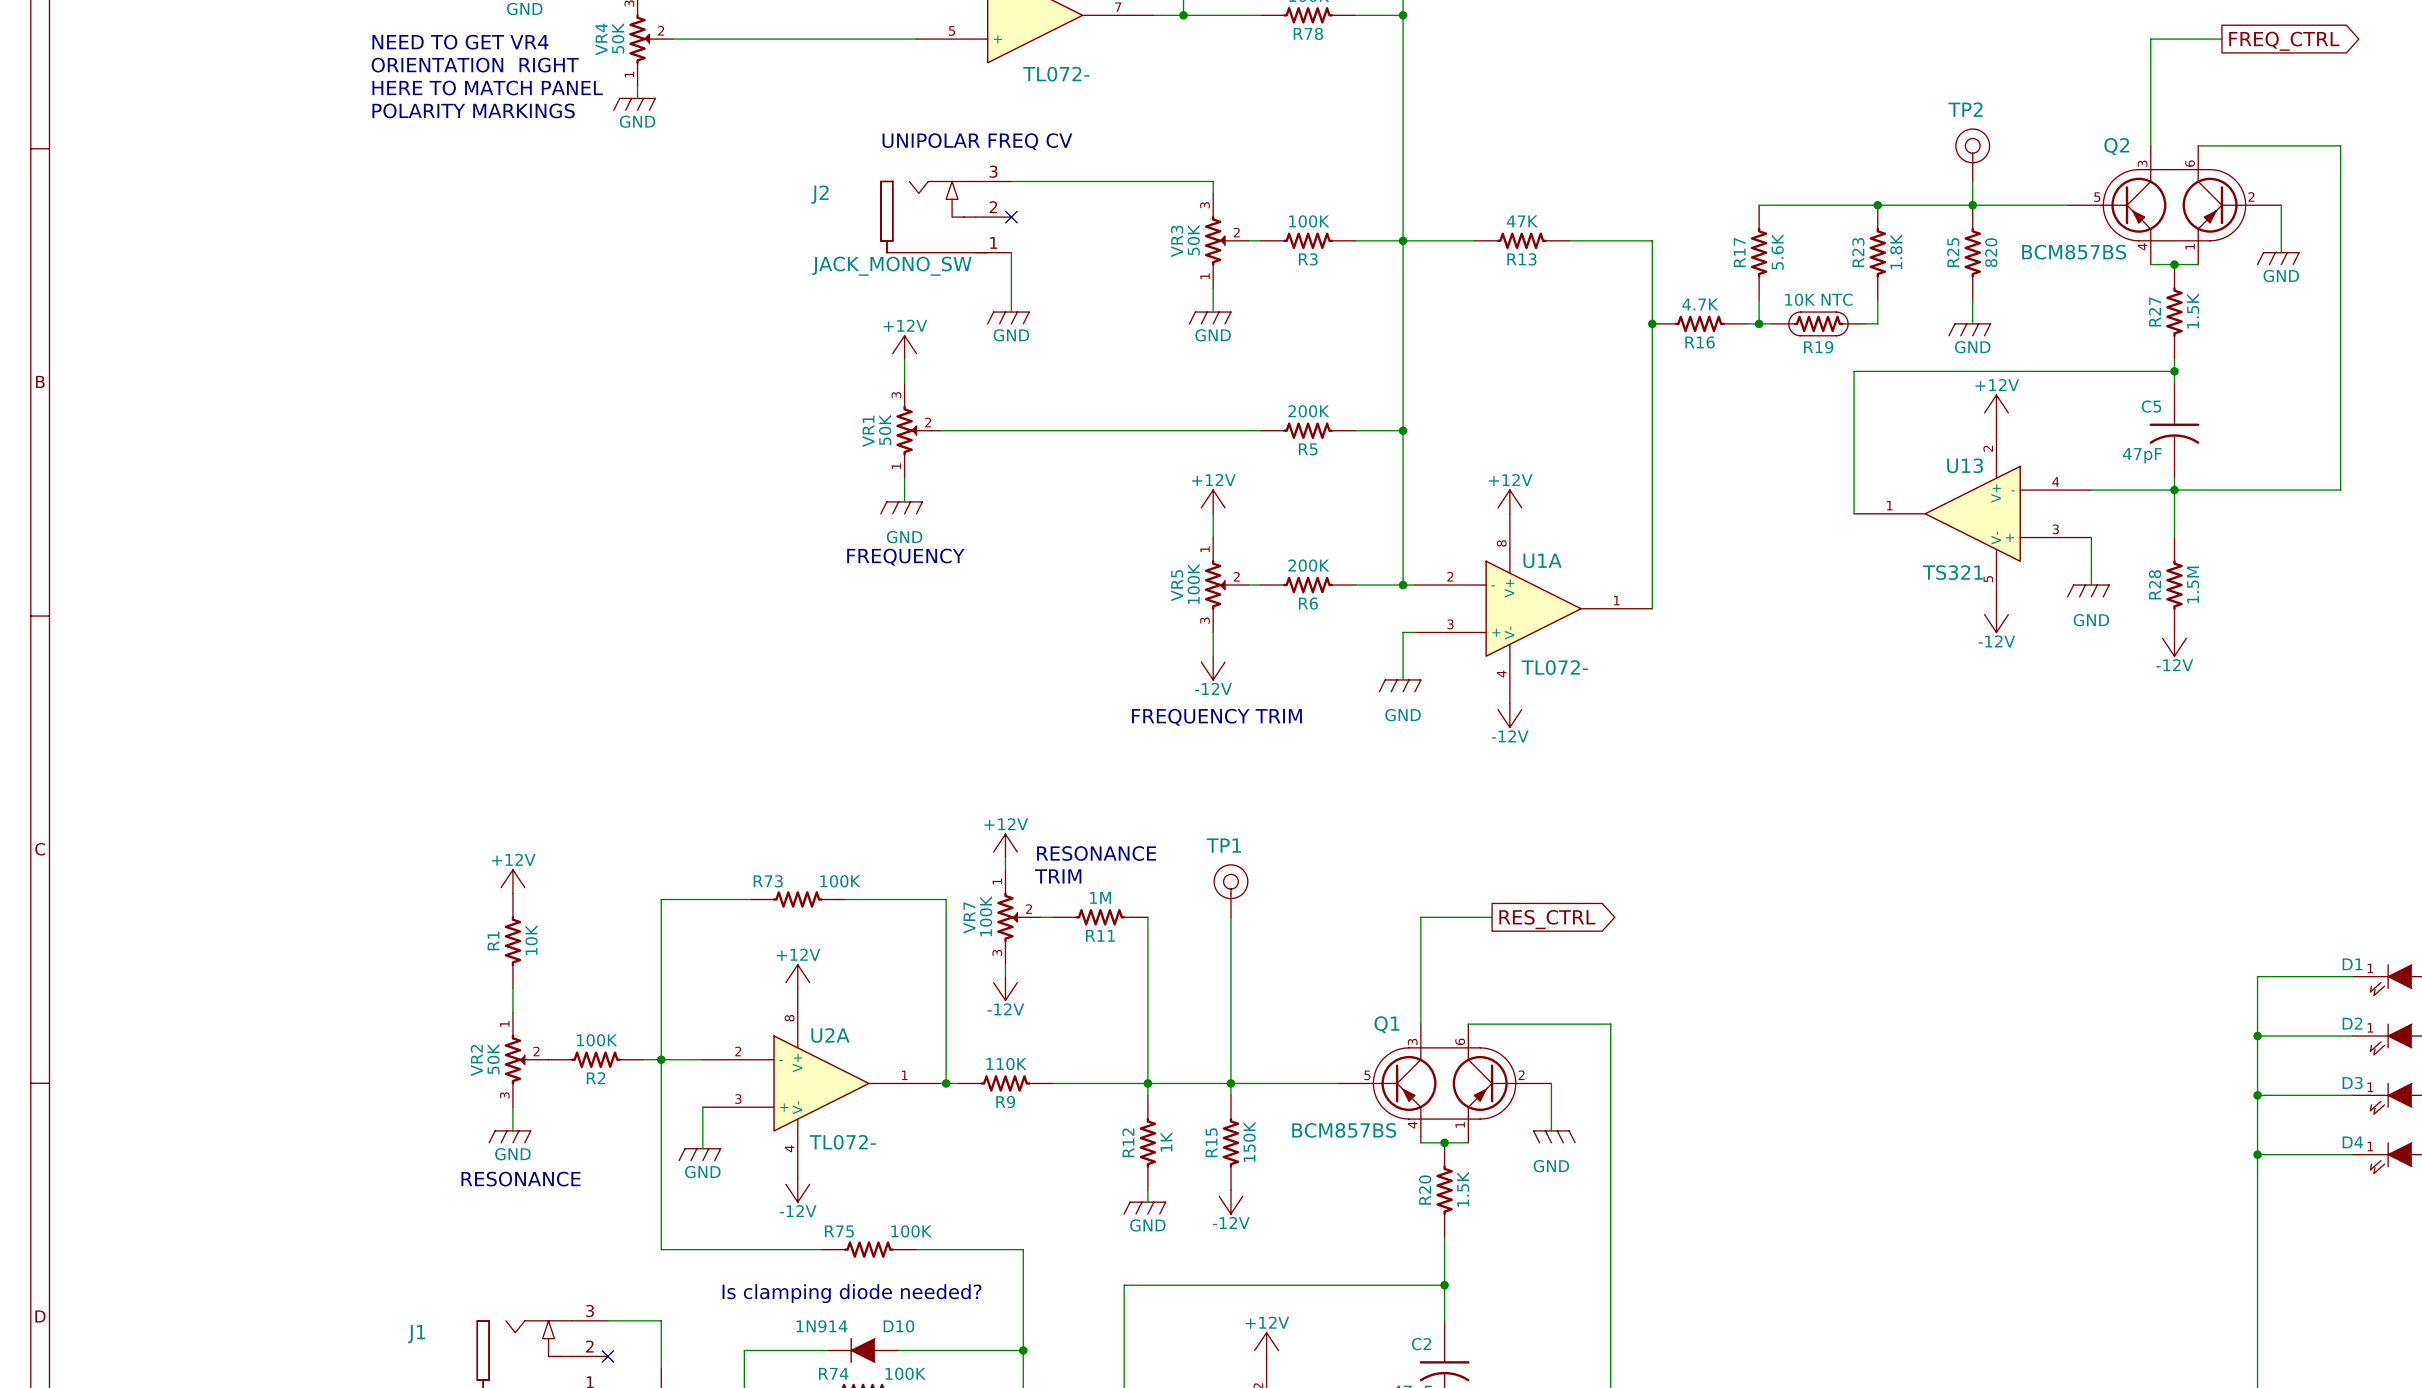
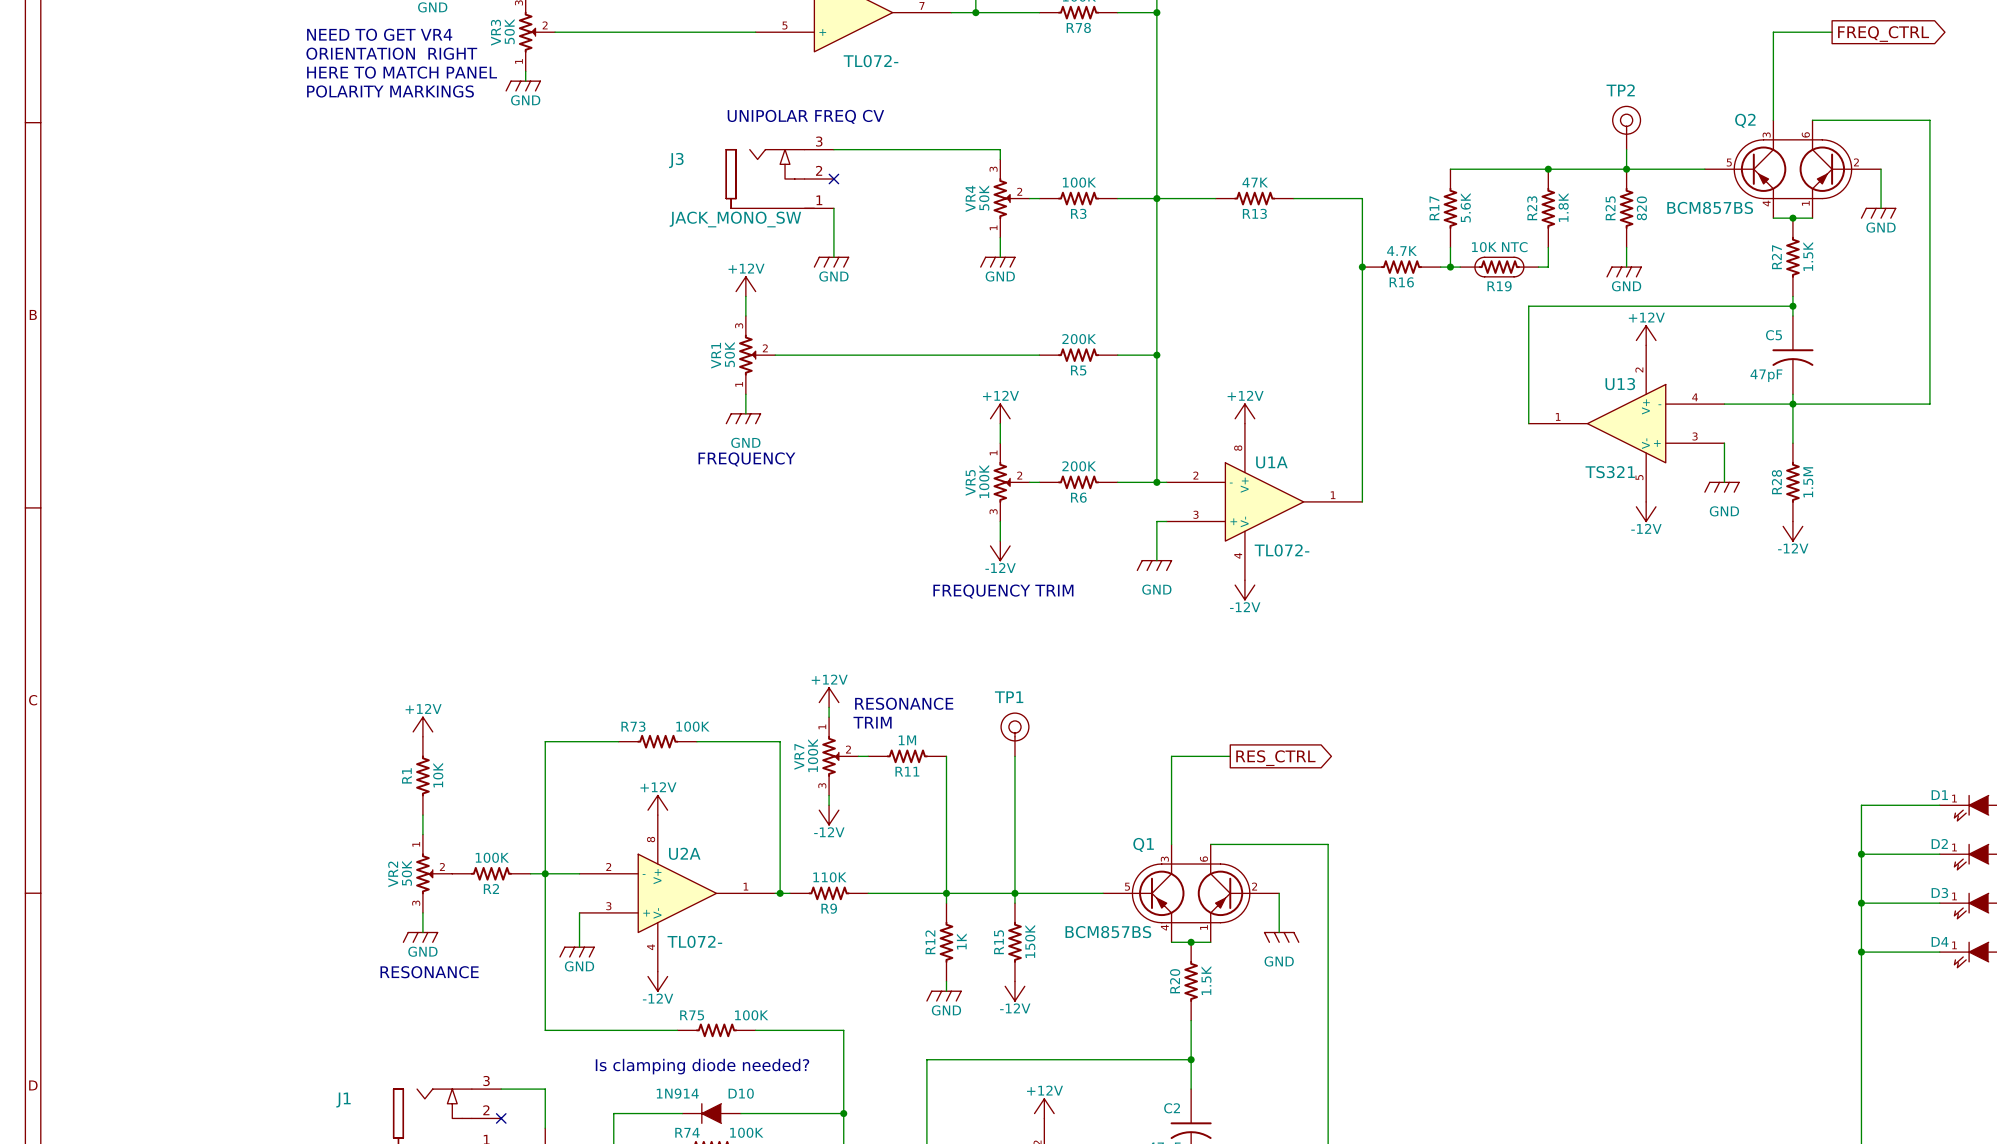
VR4 name: VR4 (601, 39) -> VR3 (495, 32)
J2 name: J2 (820, 194) -> J3 (676, 160)
VR3 name: VR3 (1177, 241) -> VR4 (970, 198)

